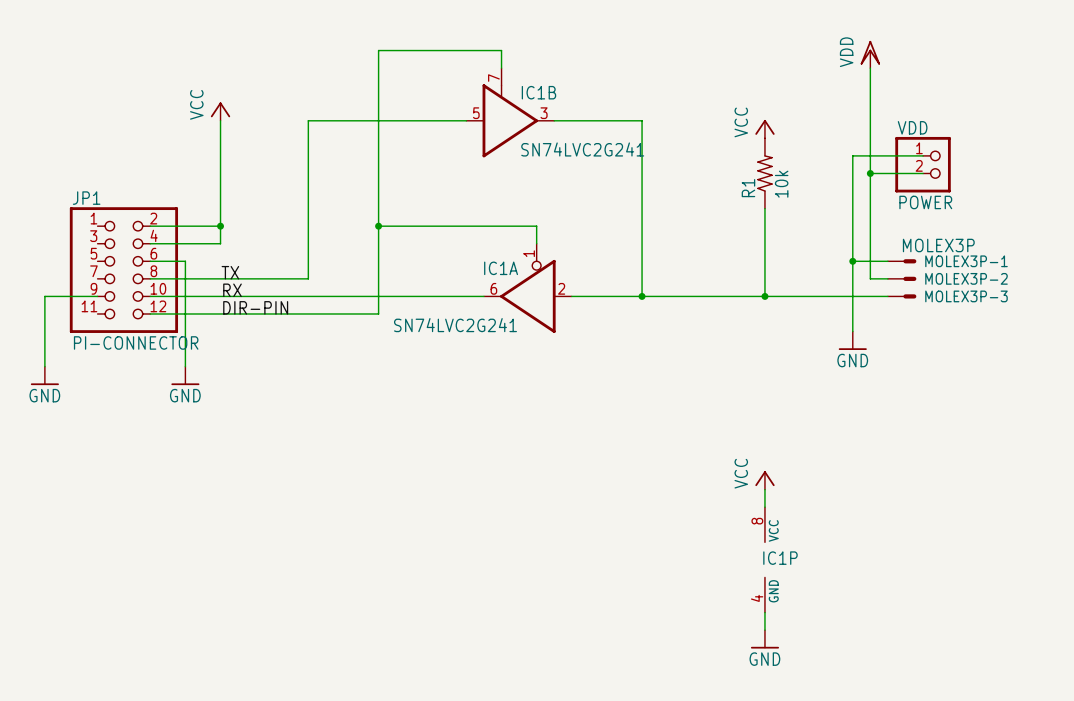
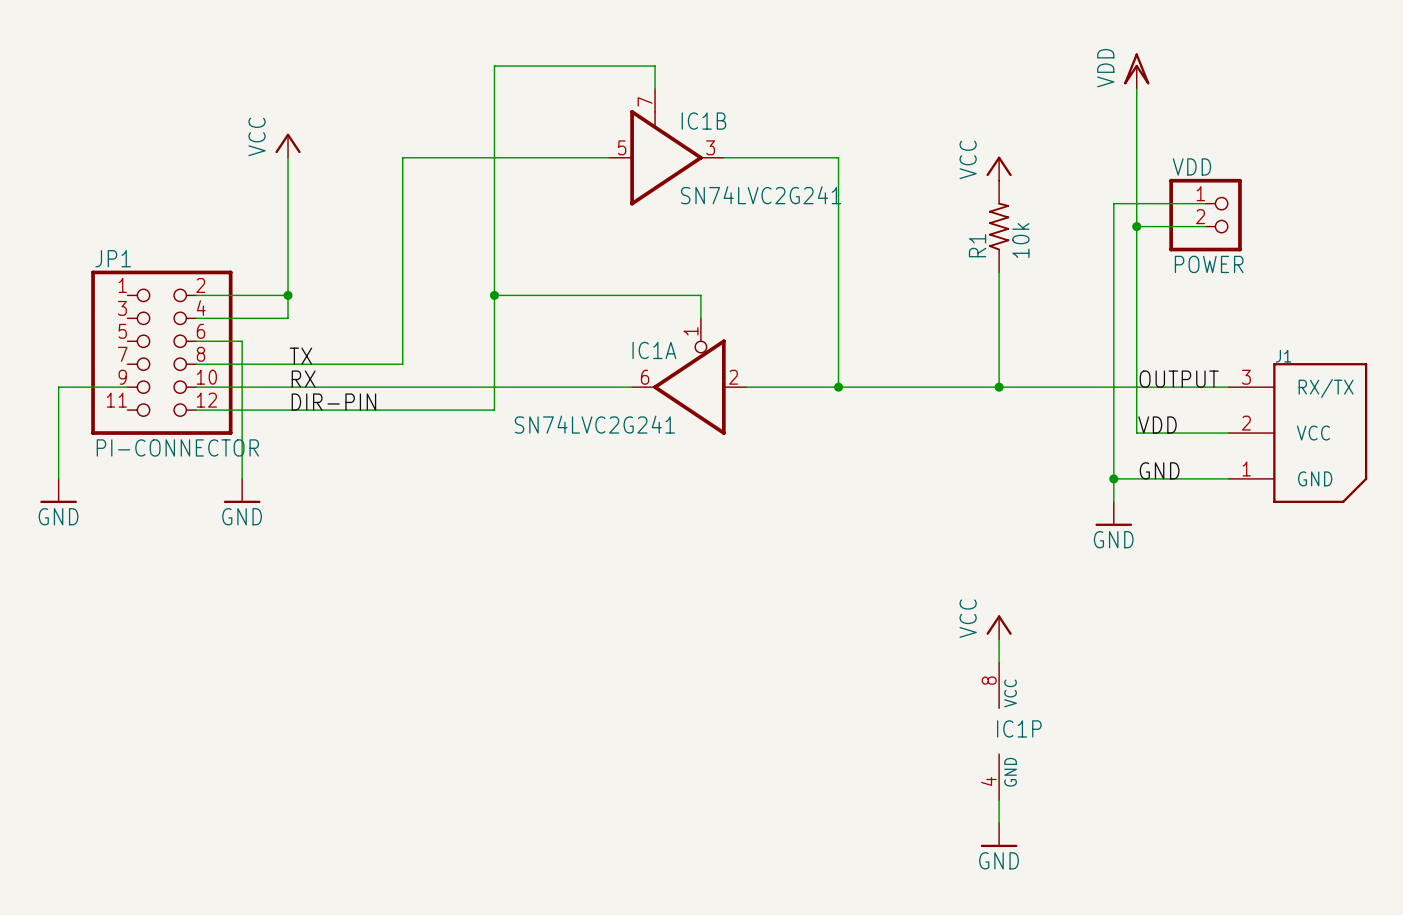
wire: (852, 261) (887, 261) -> none
junction: (852, 261) -> none
MOLEX3P-1: MOLEX3P (902, 261) -> none
wire: (870, 278) (887, 278) -> (1136, 364) (1136, 433) (1228, 433)
MOLEX3P-2: (902, 278) -> none
label: none -> OUTPUT (1179, 379)
MOLEX3P-3: (902, 296) -> none
label: none -> VDD (1157, 425)
wire: none -> (1113, 433) (1113, 501)
J1: none -> (1297, 433)
power symbol position: GND (852, 340) -> GND (1113, 513)
label: none -> GND (1159, 470)
wire: none -> (1113, 478) (1228, 478)
junction: none -> (1113, 478)

